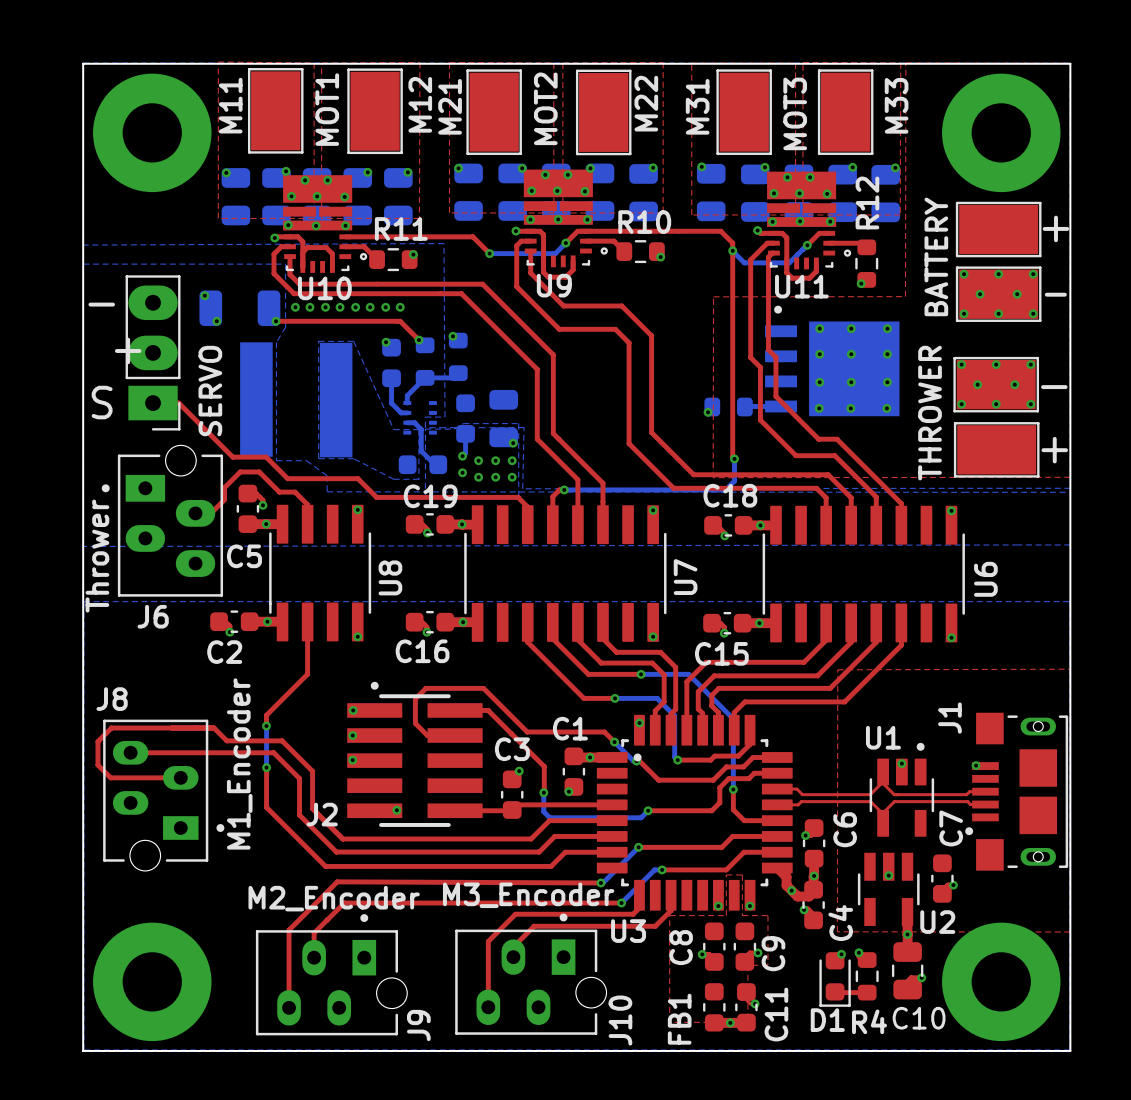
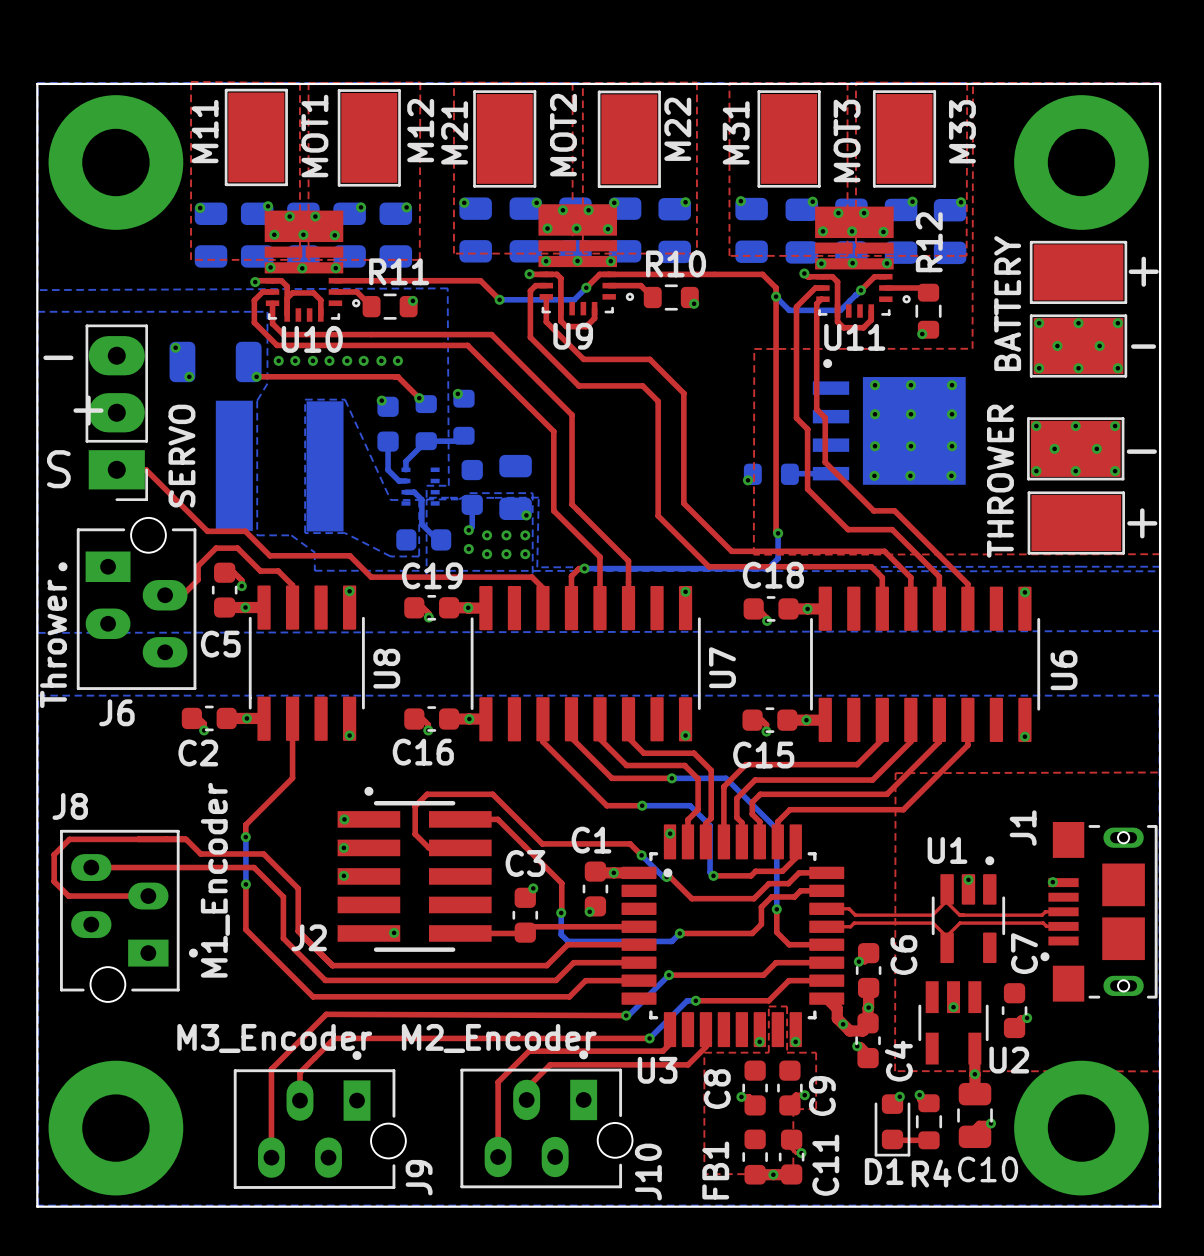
J10 value position: M3_Encoder (528, 895) -> M3_Encoder (274, 1038)
J9 value position: M2_Encoder (334, 898) -> M2_Encoder (499, 1038)

